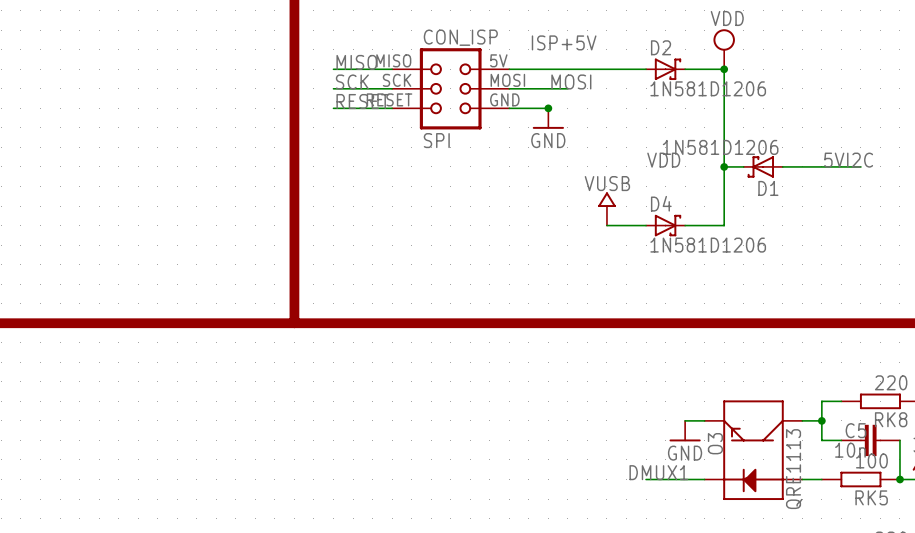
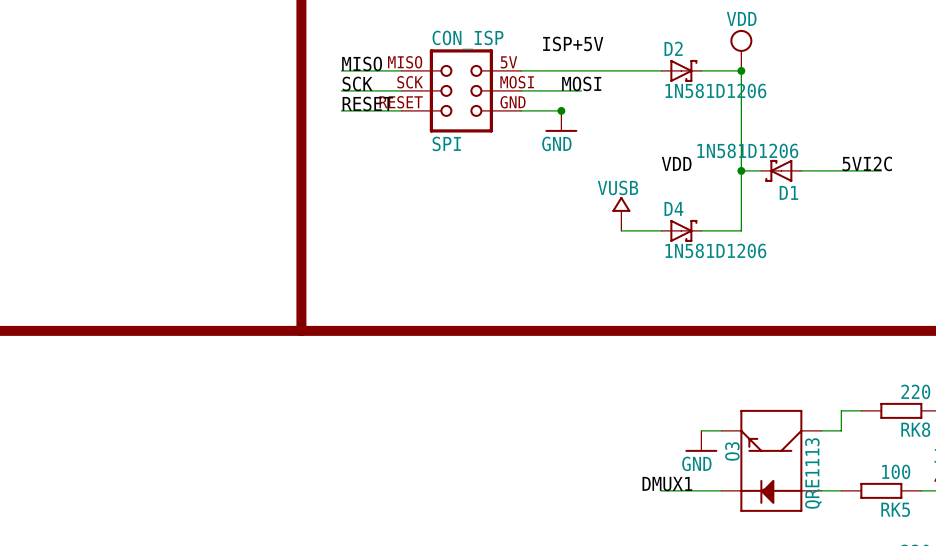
wire: (821, 420) (821, 440) (841, 440) -> none
junction: (821, 420) -> none
C5: 10n (870, 440) -> none
wire: (899, 440) (899, 479) -> none
junction: (899, 479) -> none

